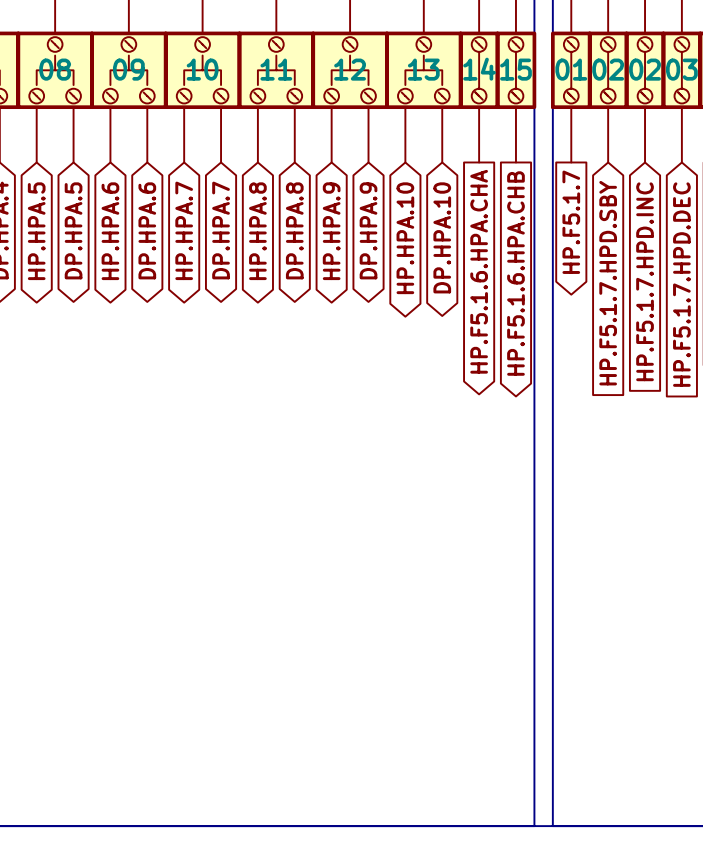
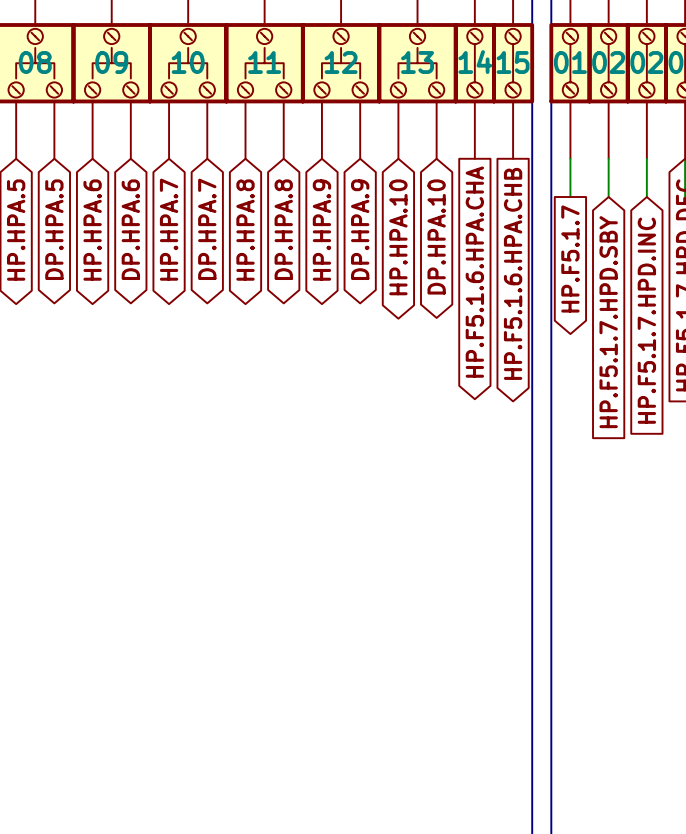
wire: none -> (570, 158) (570, 197)
wire: none -> (608, 158) (608, 197)
wire: none -> (646, 158) (646, 197)
wire: none -> (685, 158) (685, 197)
global label position: HP.F5.1.7 (571, 222) -> HP.F5.1.7 (570, 259)
global label position: HP.F5.1.7.HPD.INC (645, 281) -> HP.F5.1.7.HPD.INC (646, 320)
global label position: HP.F5.1.7.HPD.SBY (608, 283) -> HP.F5.1.7.HPD.SBY (608, 322)

